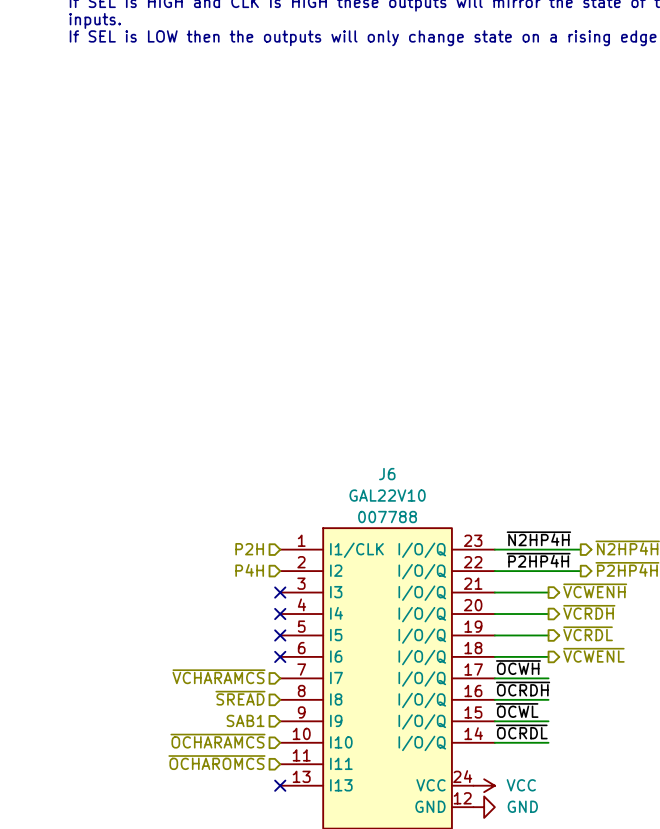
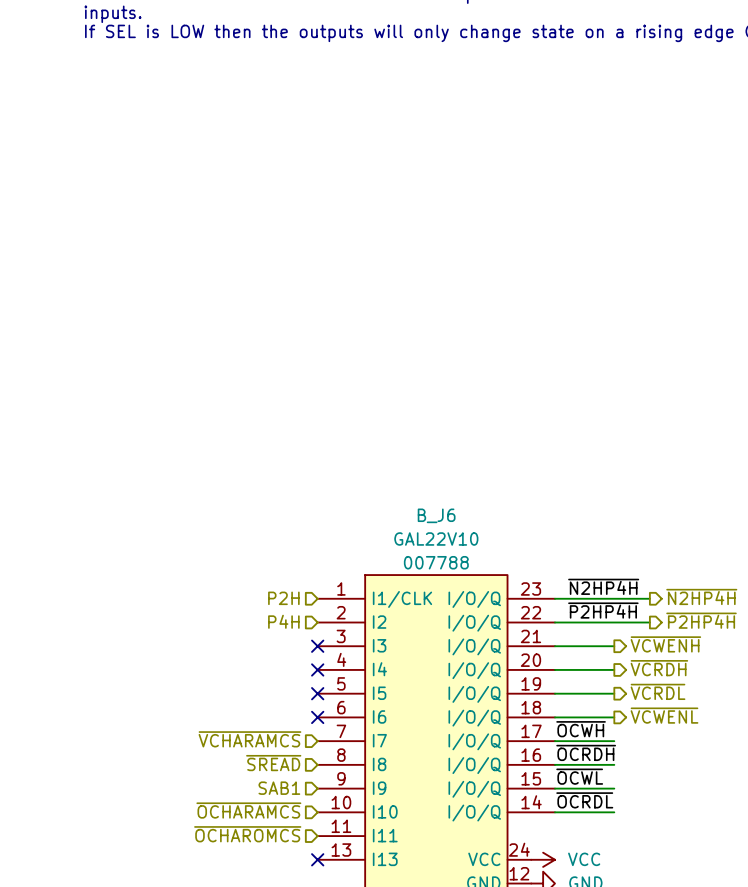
J6 name: J6 (387, 474) -> B_J6 (436, 515)

